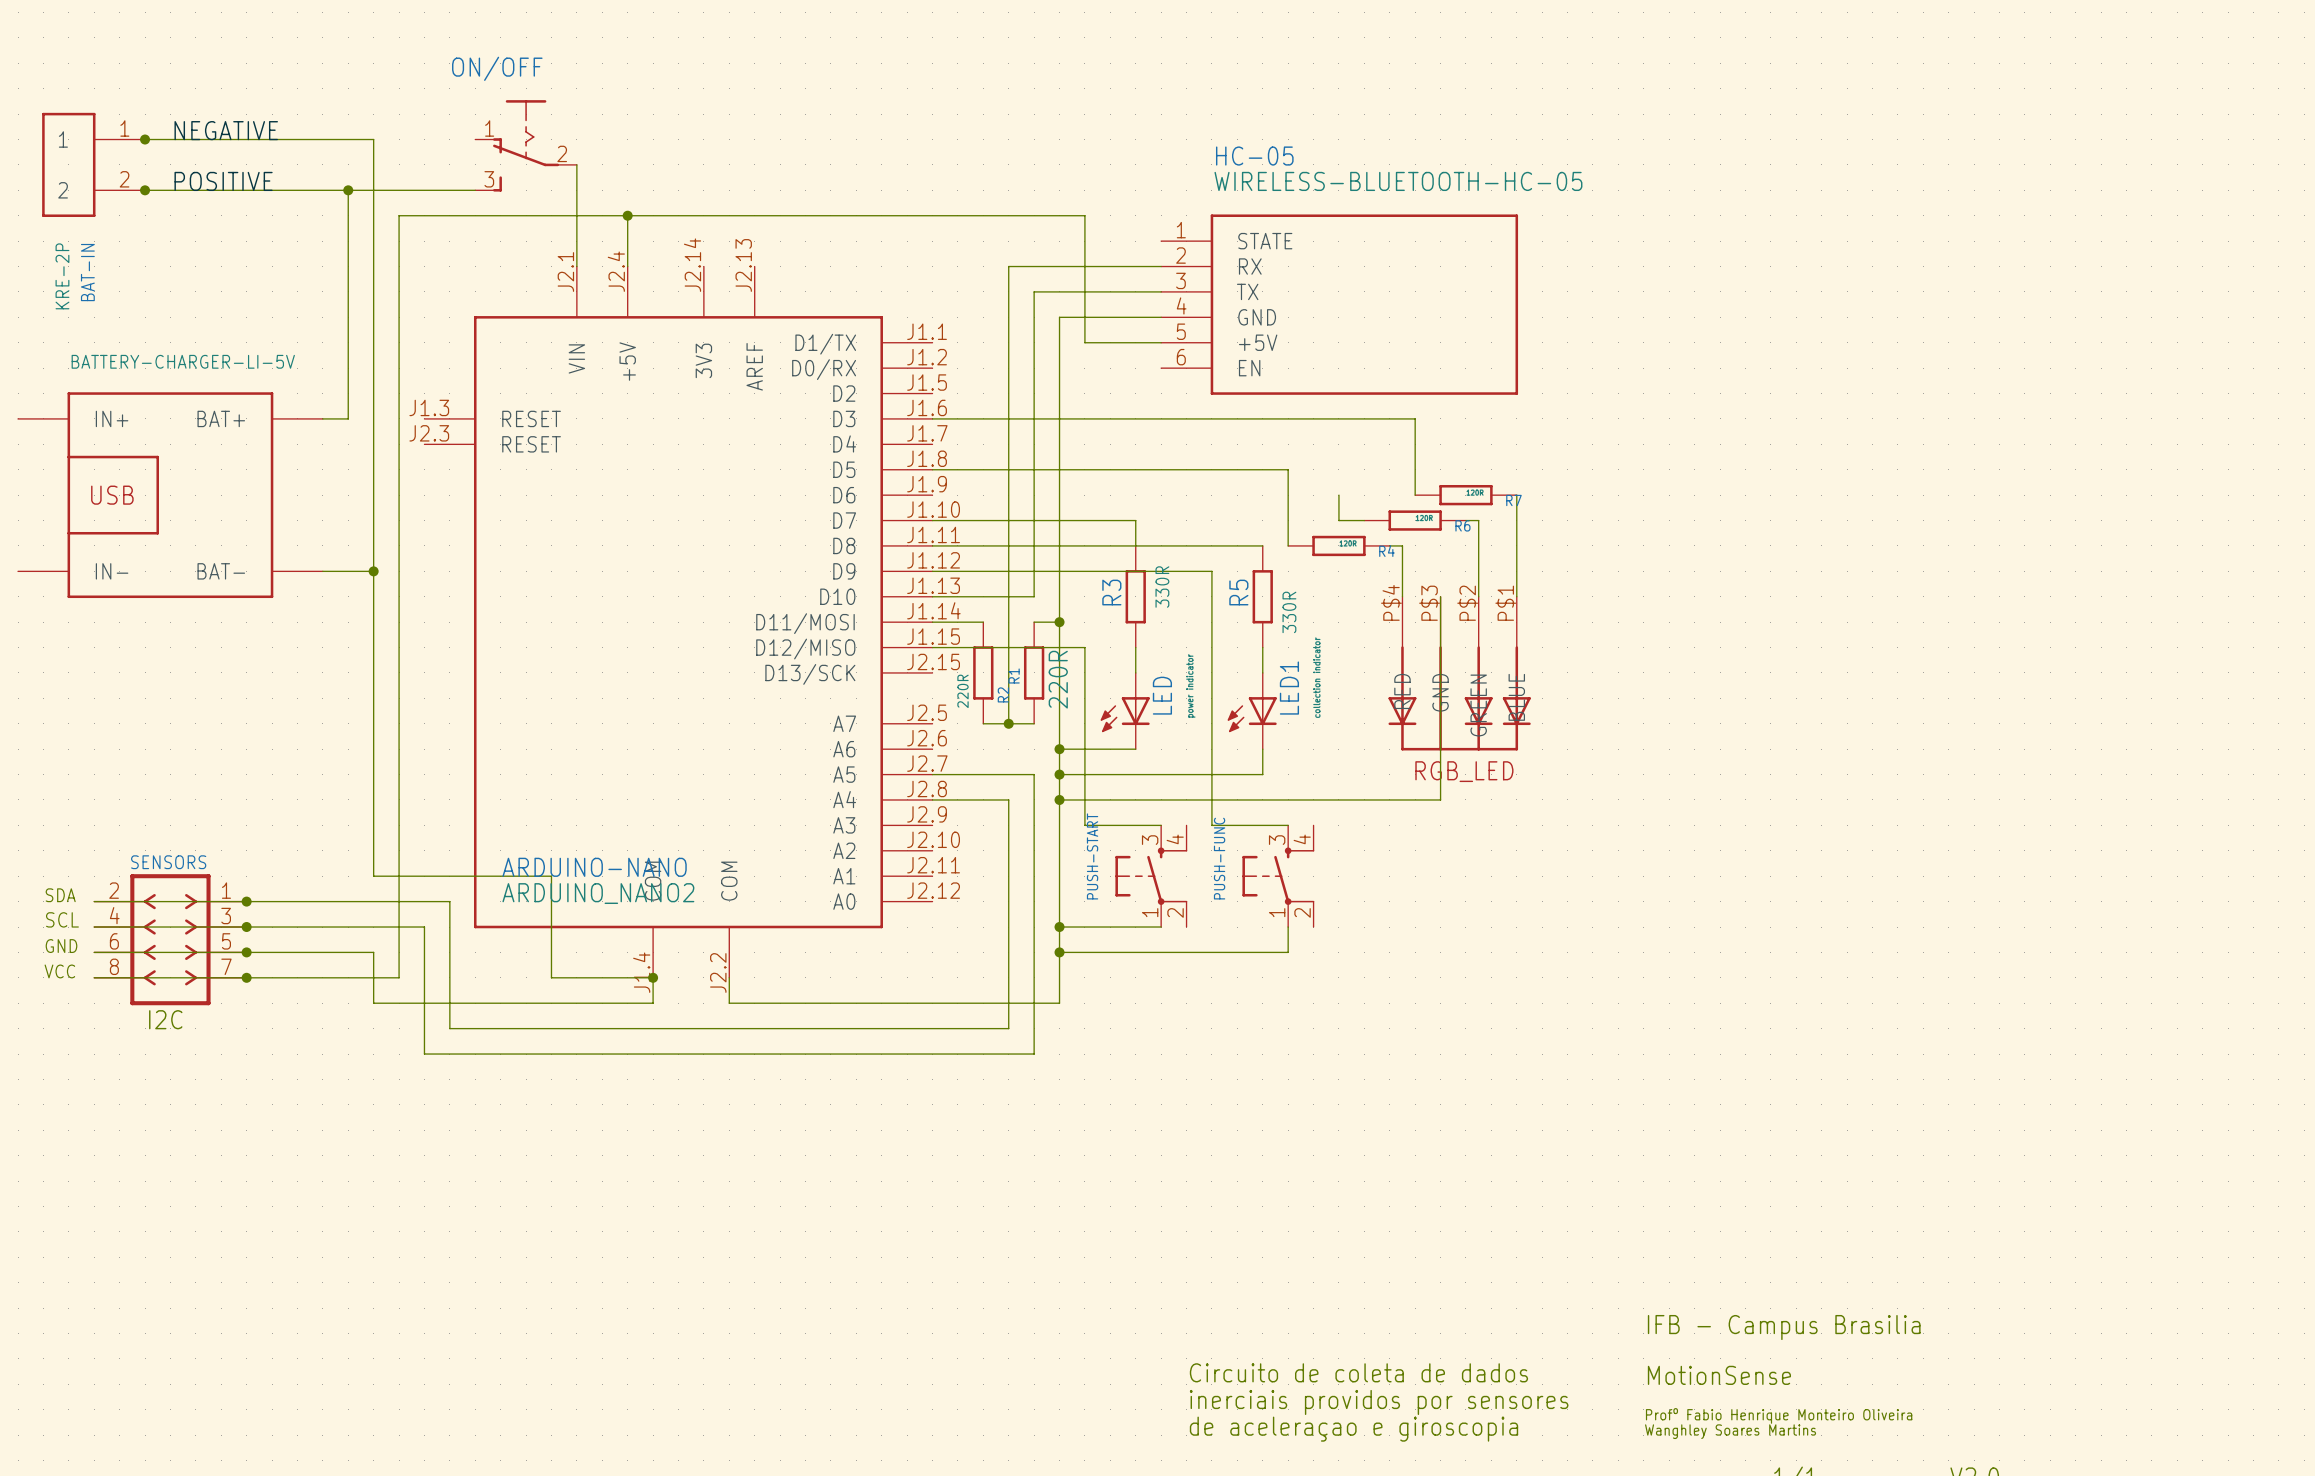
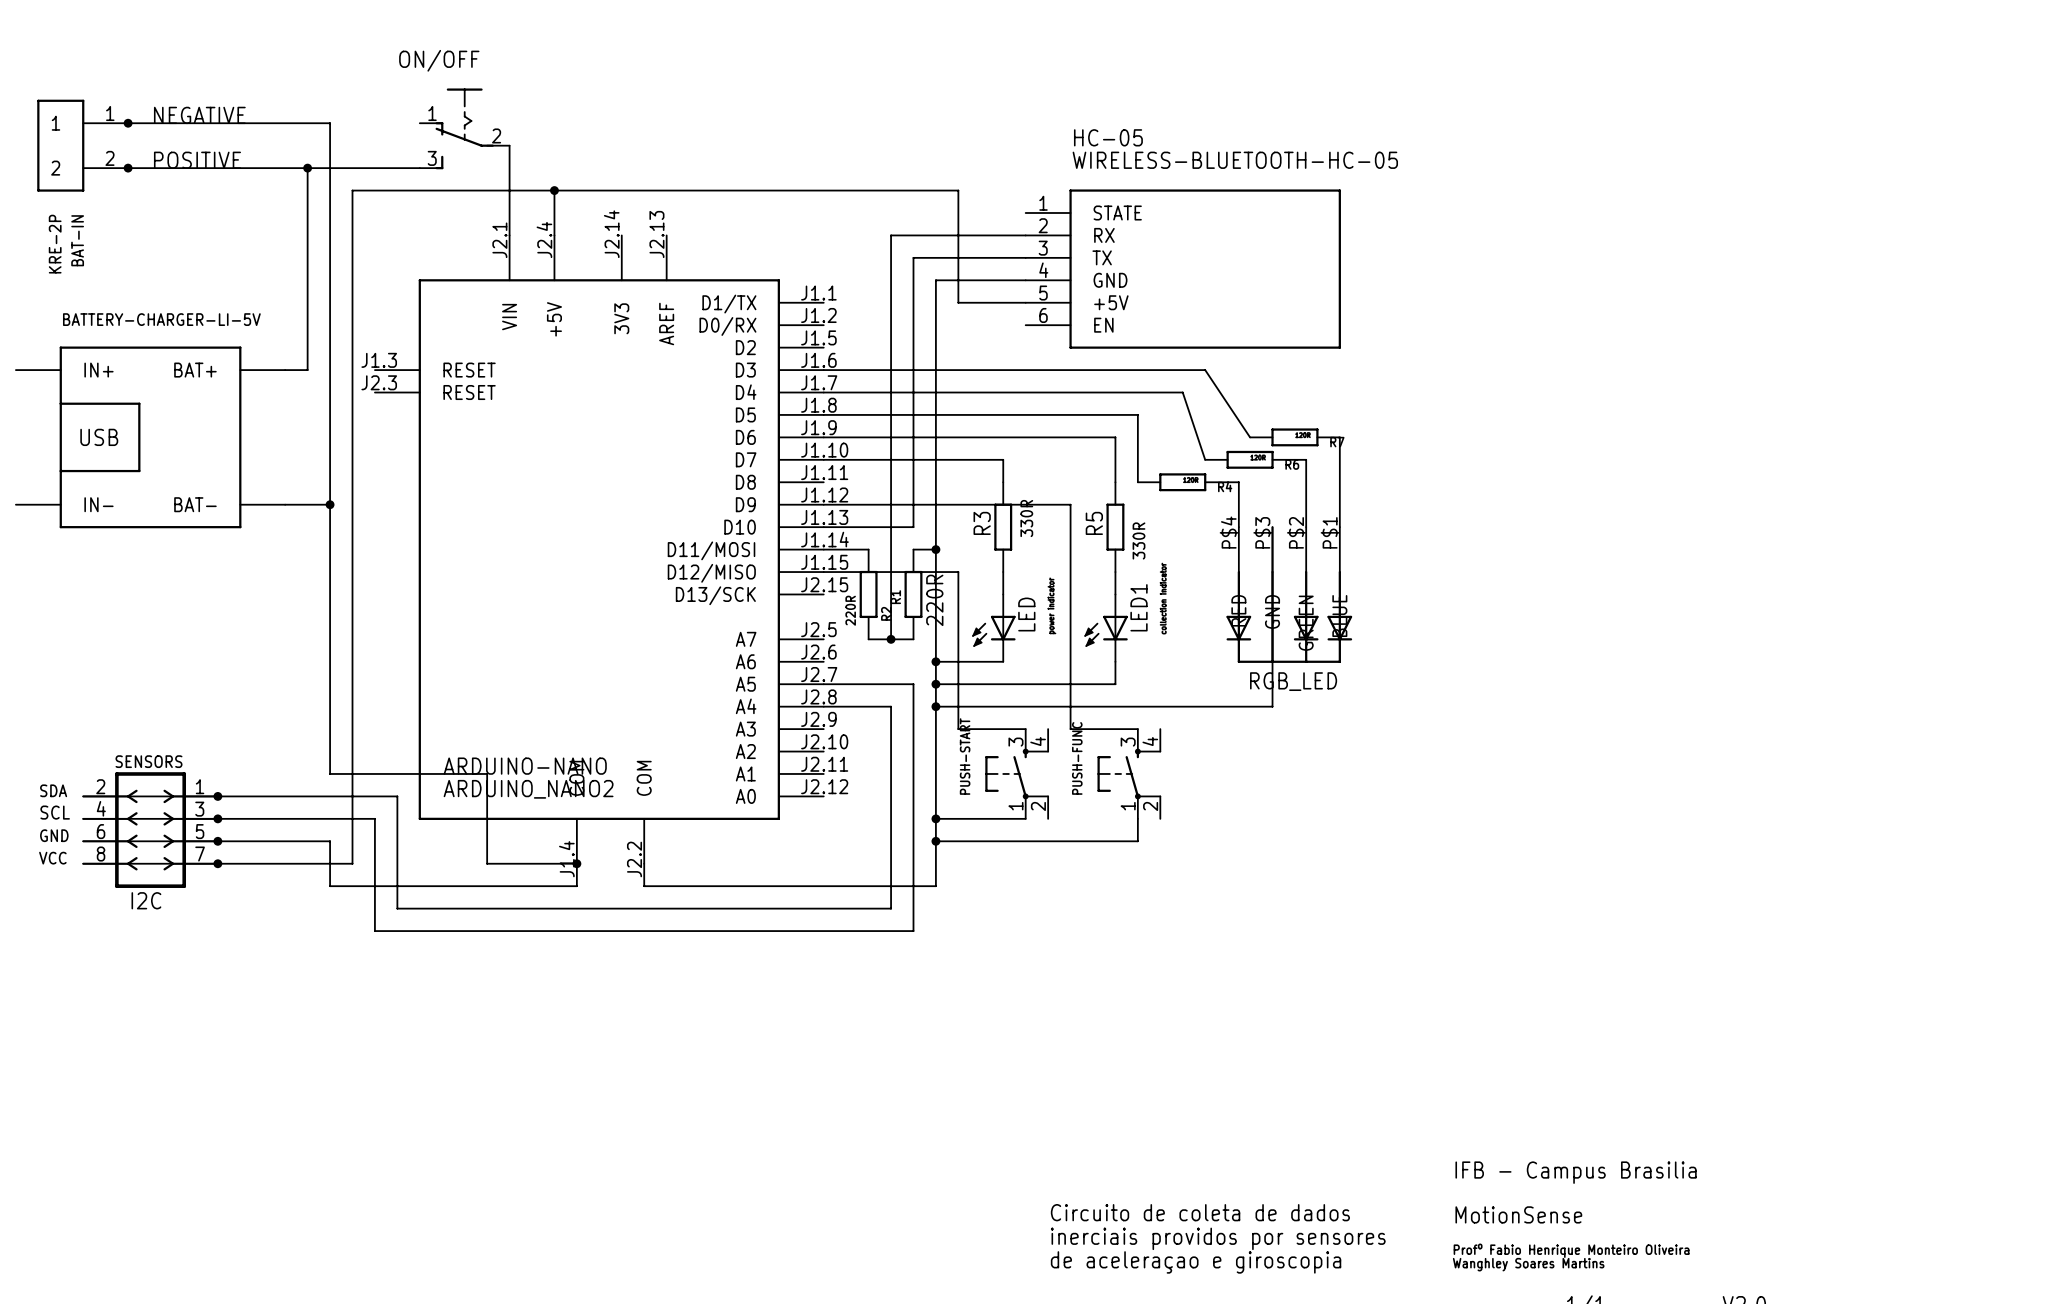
wire: (1364, 418) (1415, 418) (1415, 495) -> (1205, 370) (1250, 437)
wire: (1338, 495) (1338, 520) (1364, 520) -> (823, 392) (1182, 392) (1205, 459)
wire: (932, 545) (1262, 545) -> (823, 437) (1115, 437) (1115, 482)

